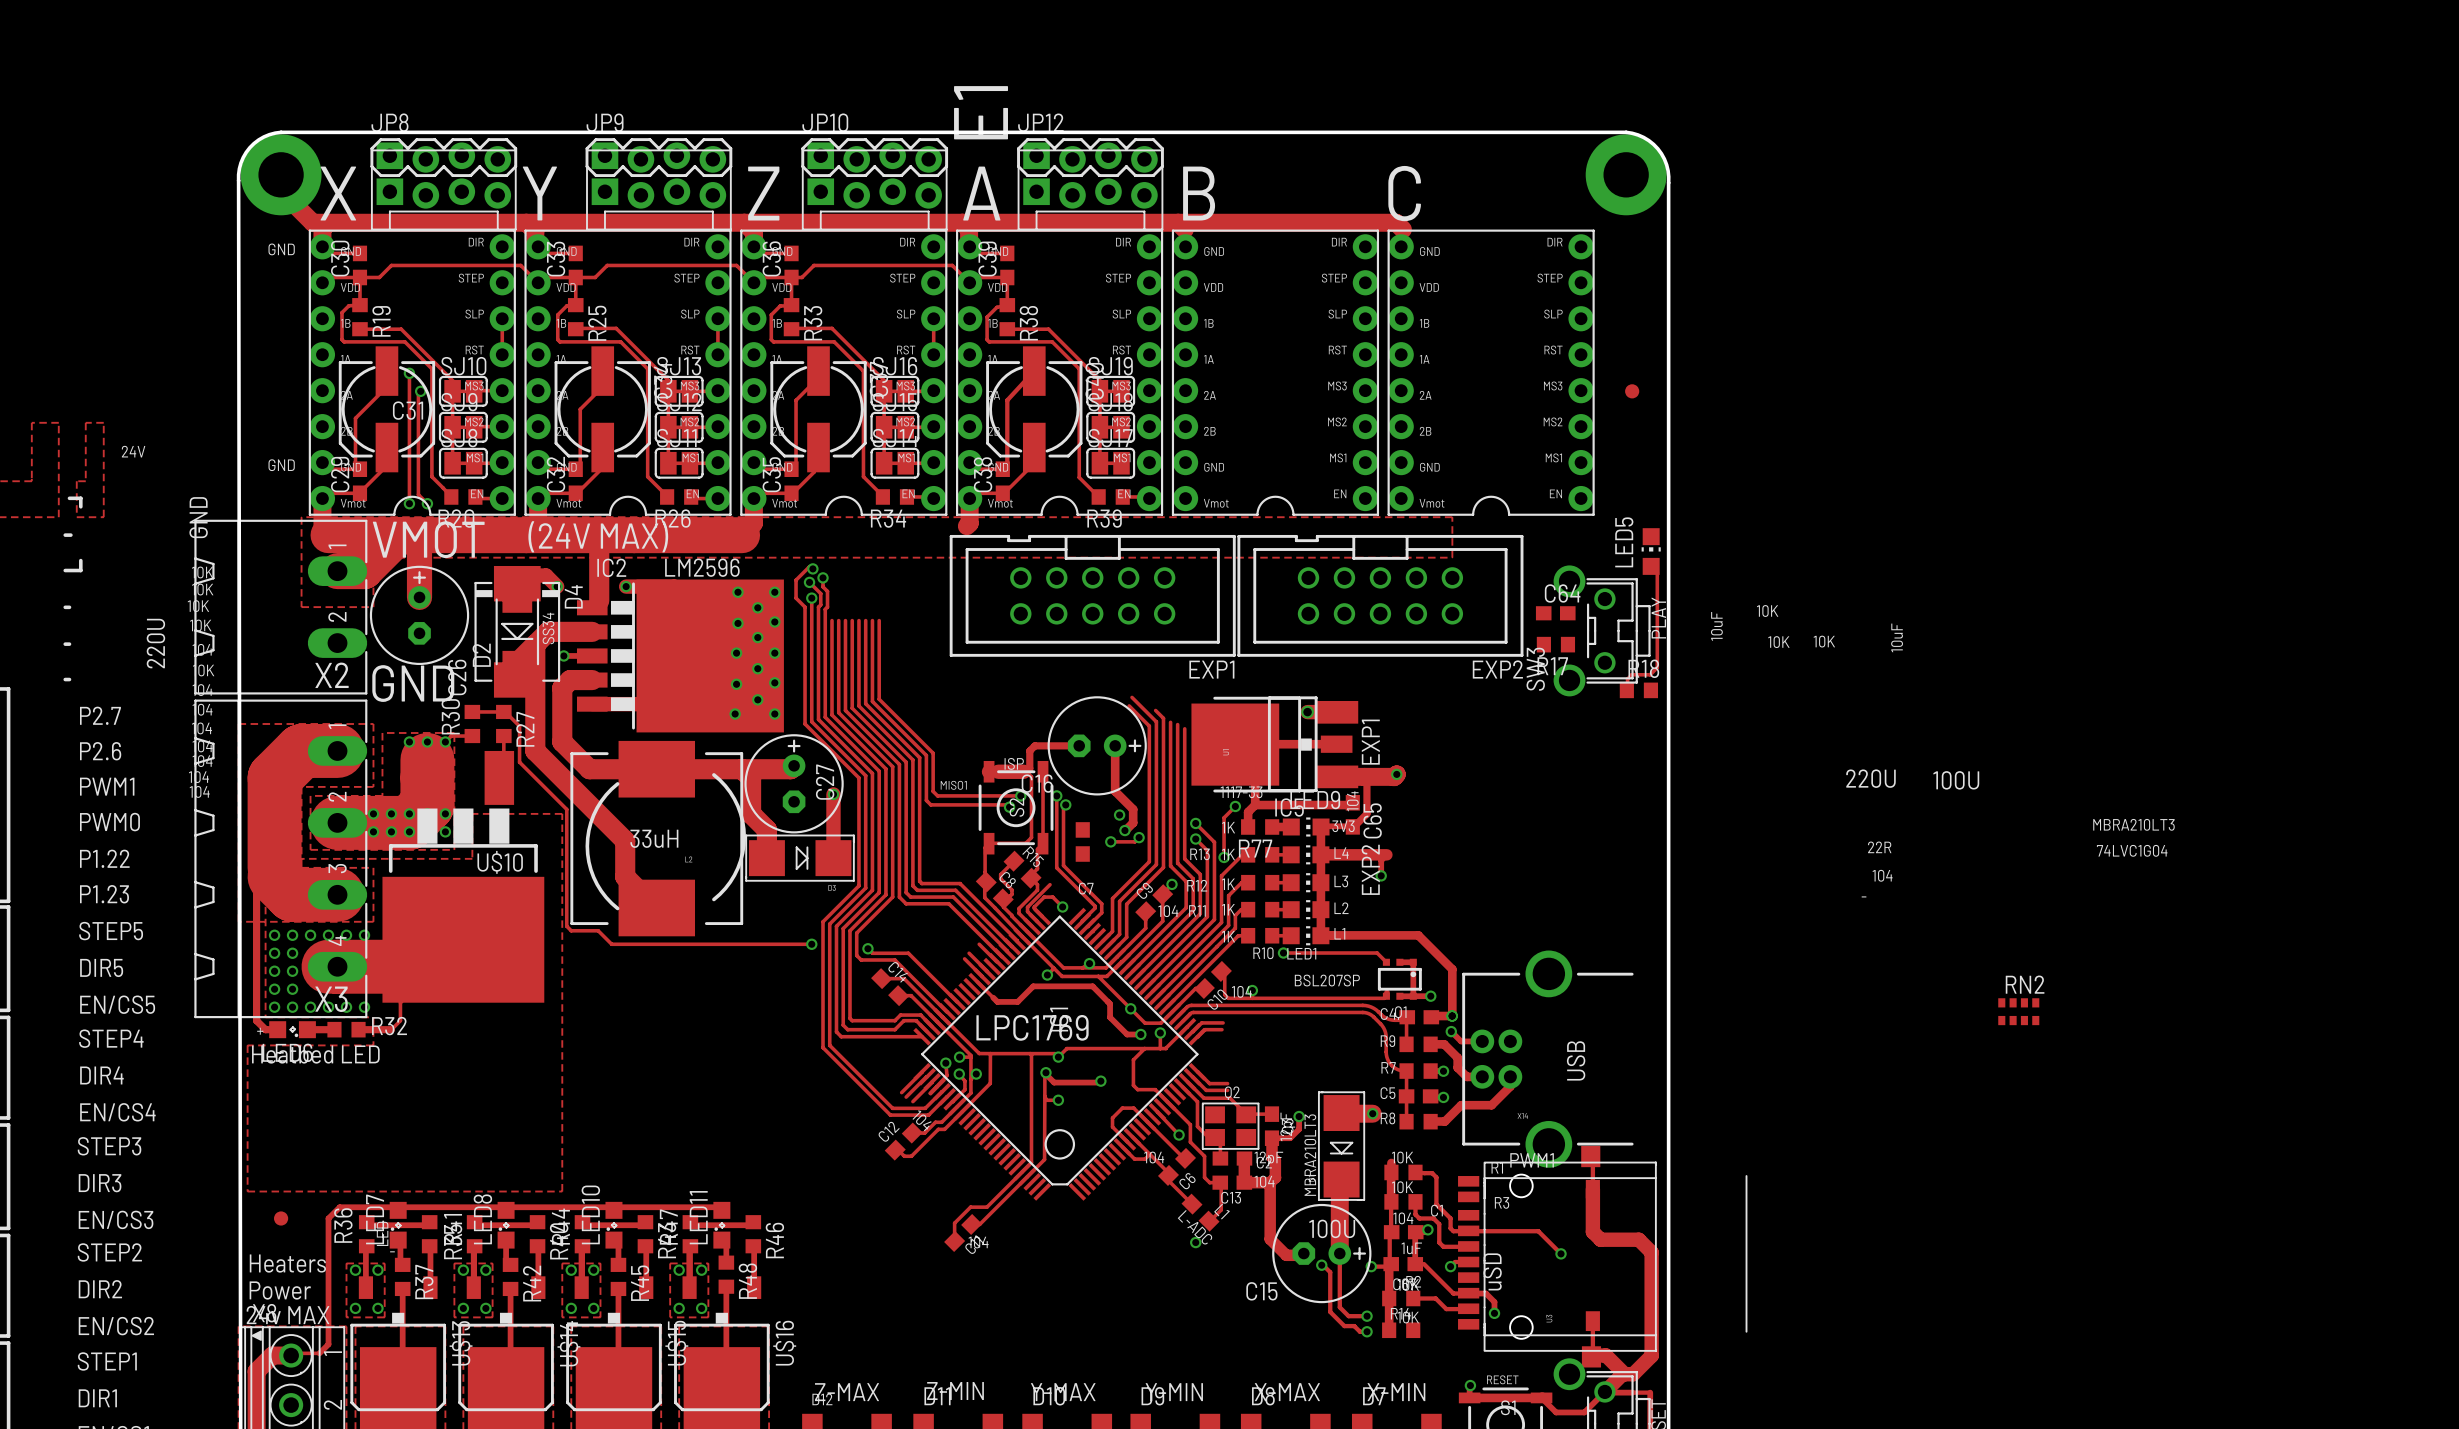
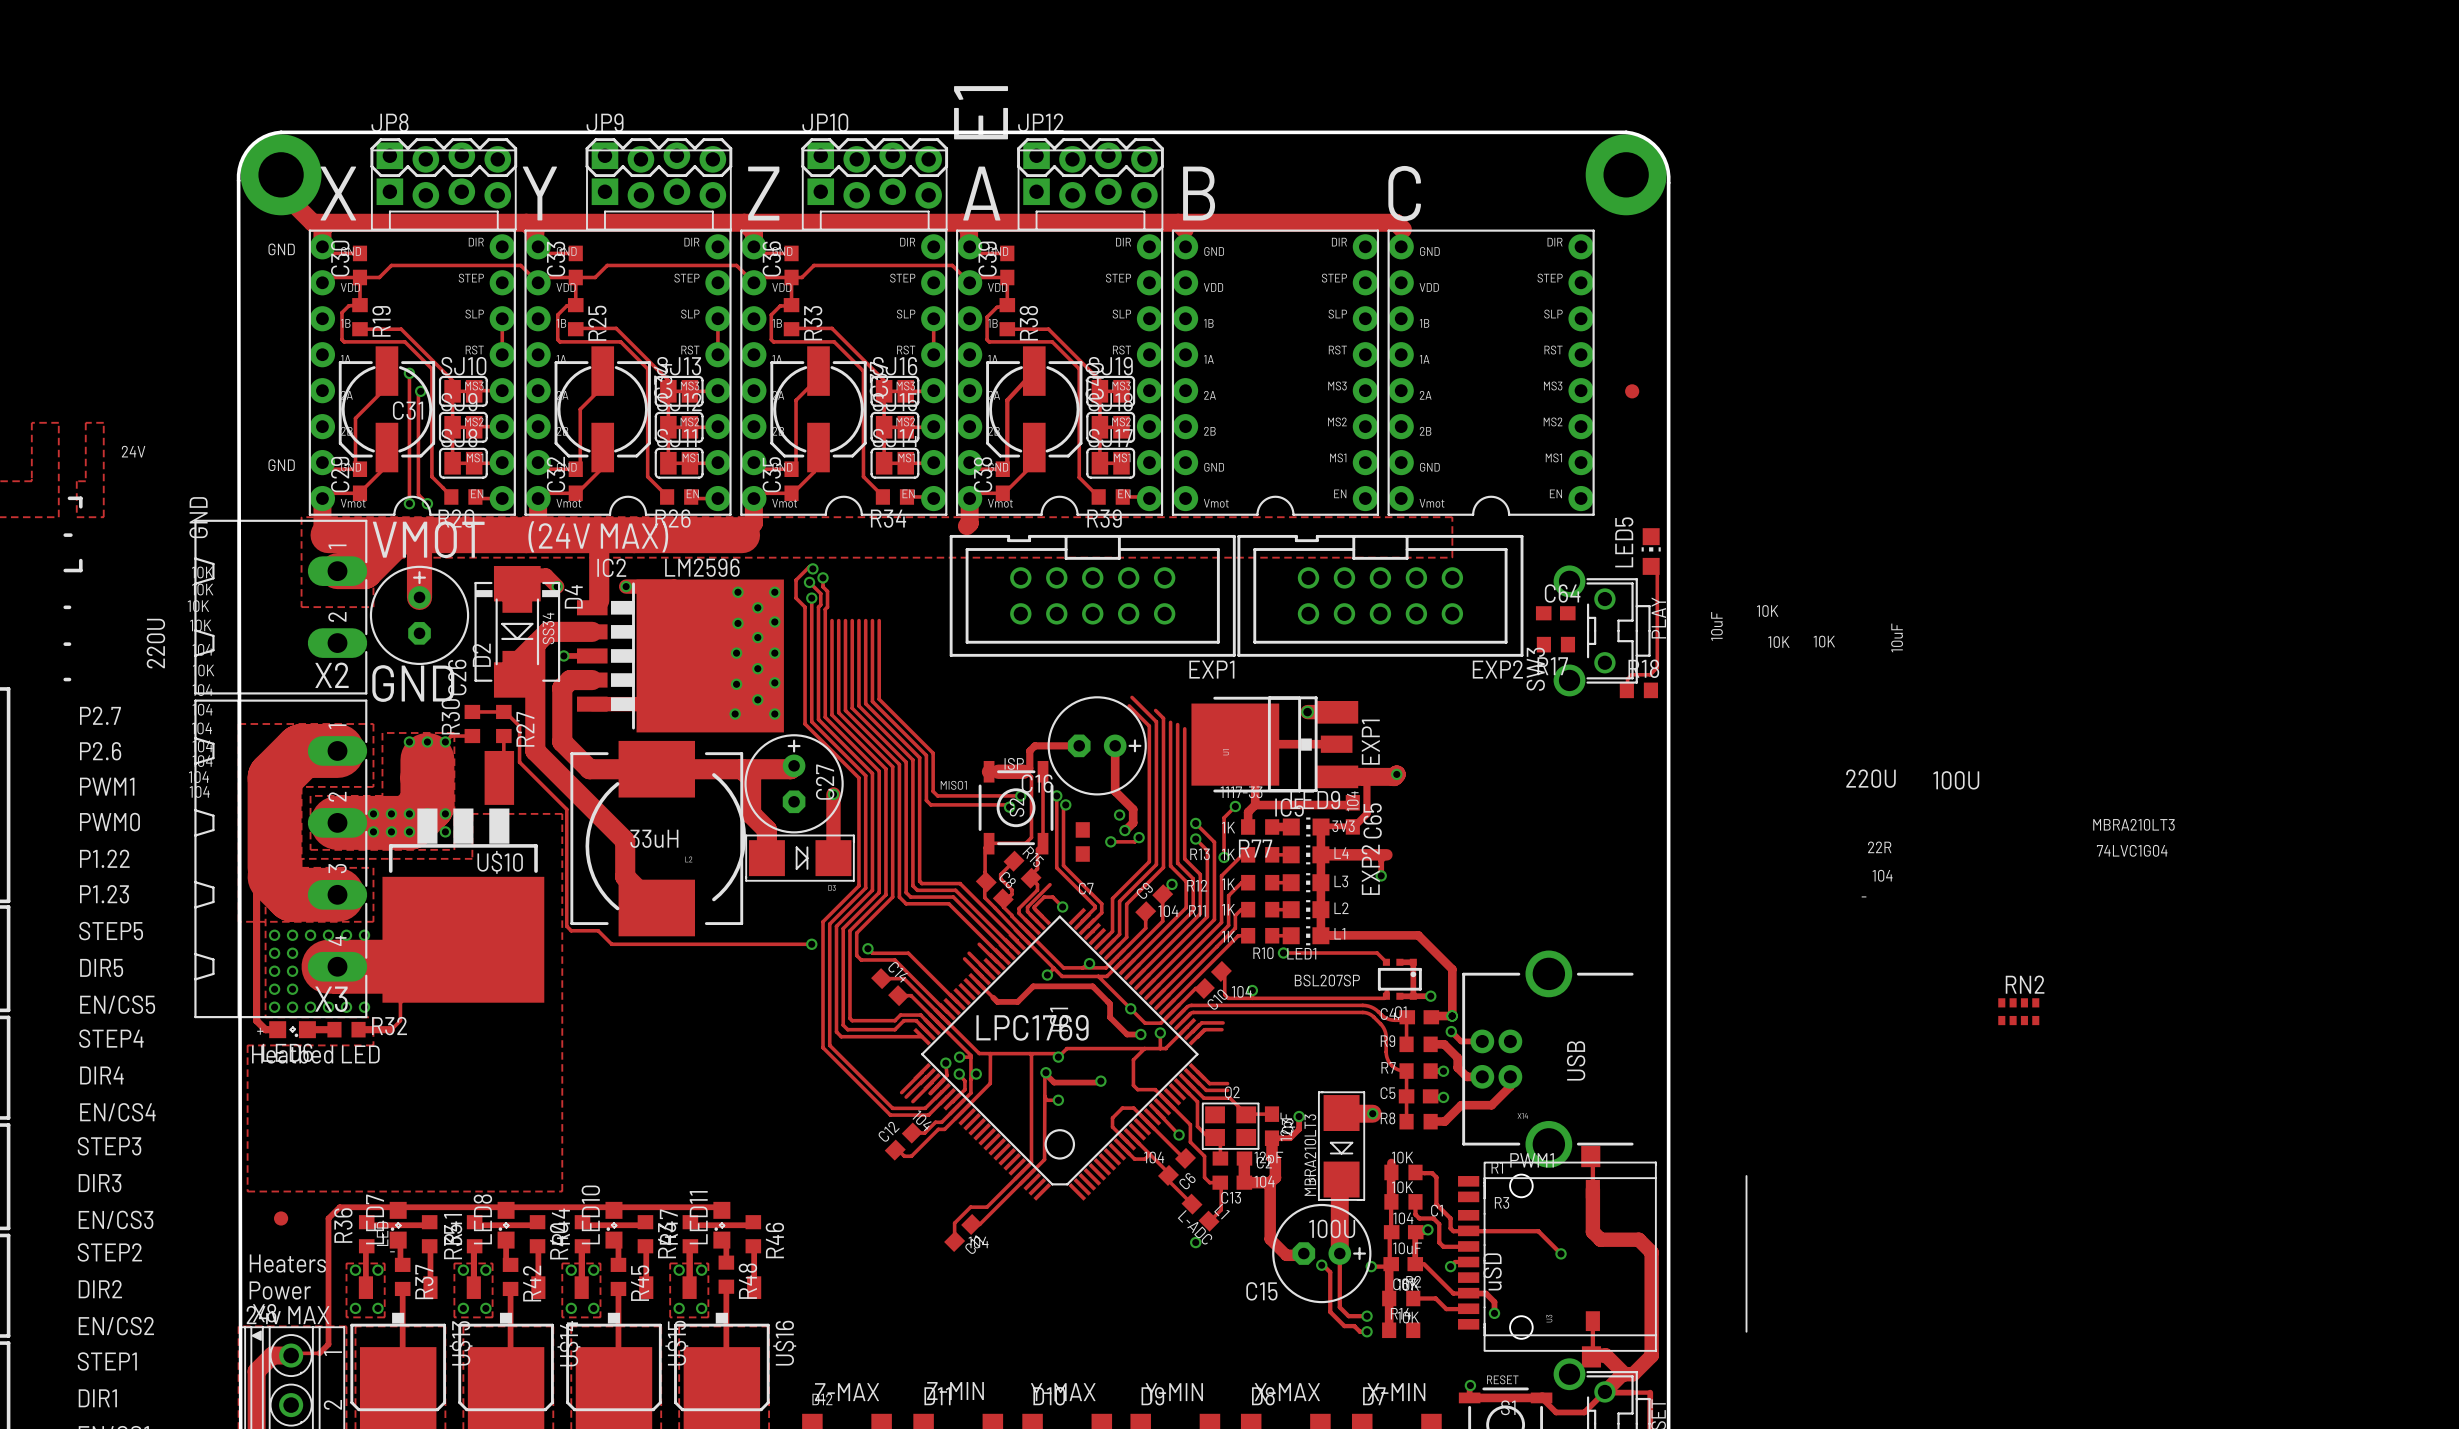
text: 1uF (1411, 1248) -> 10uF (1407, 1248)

